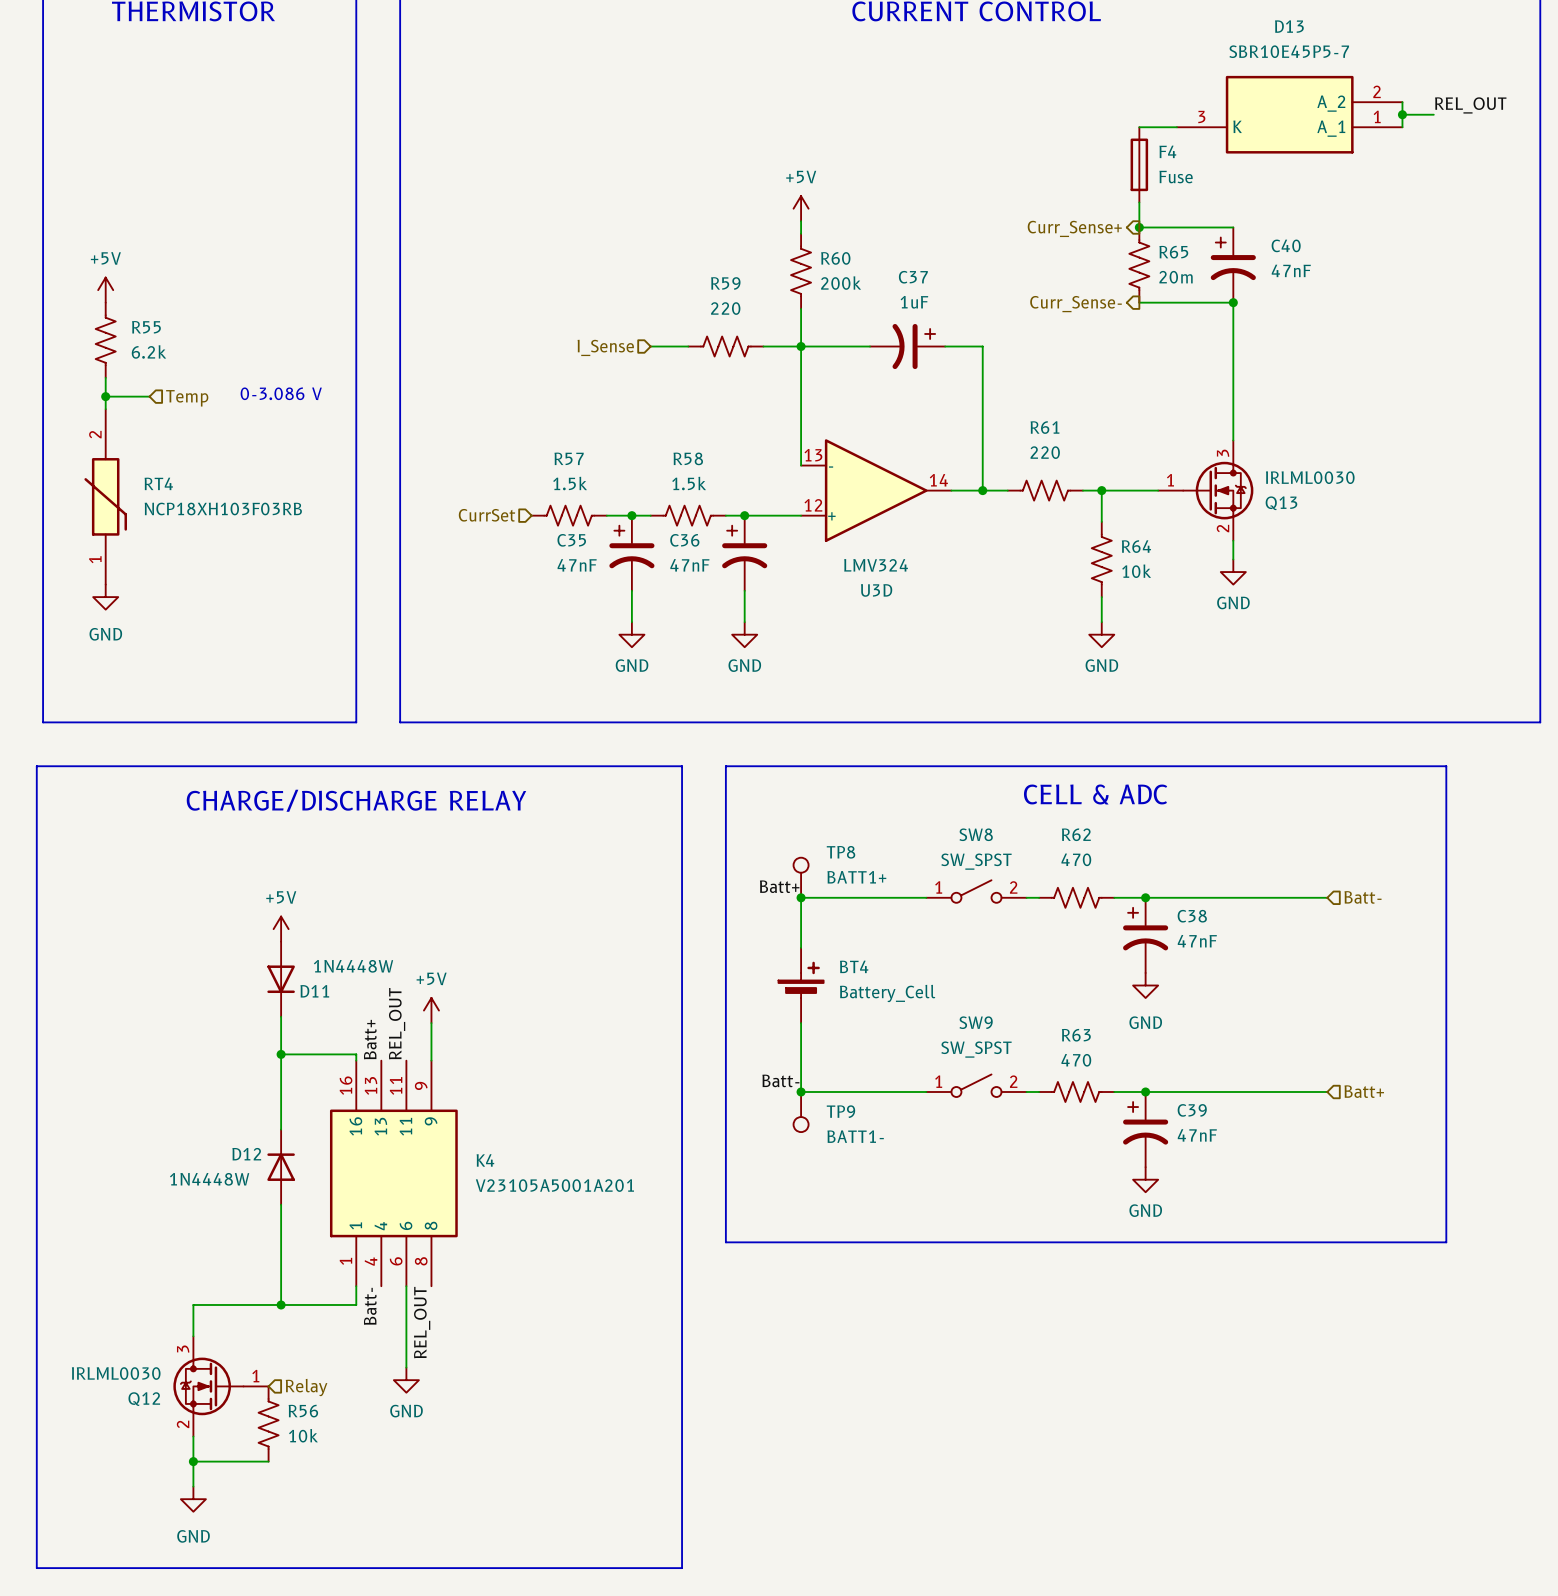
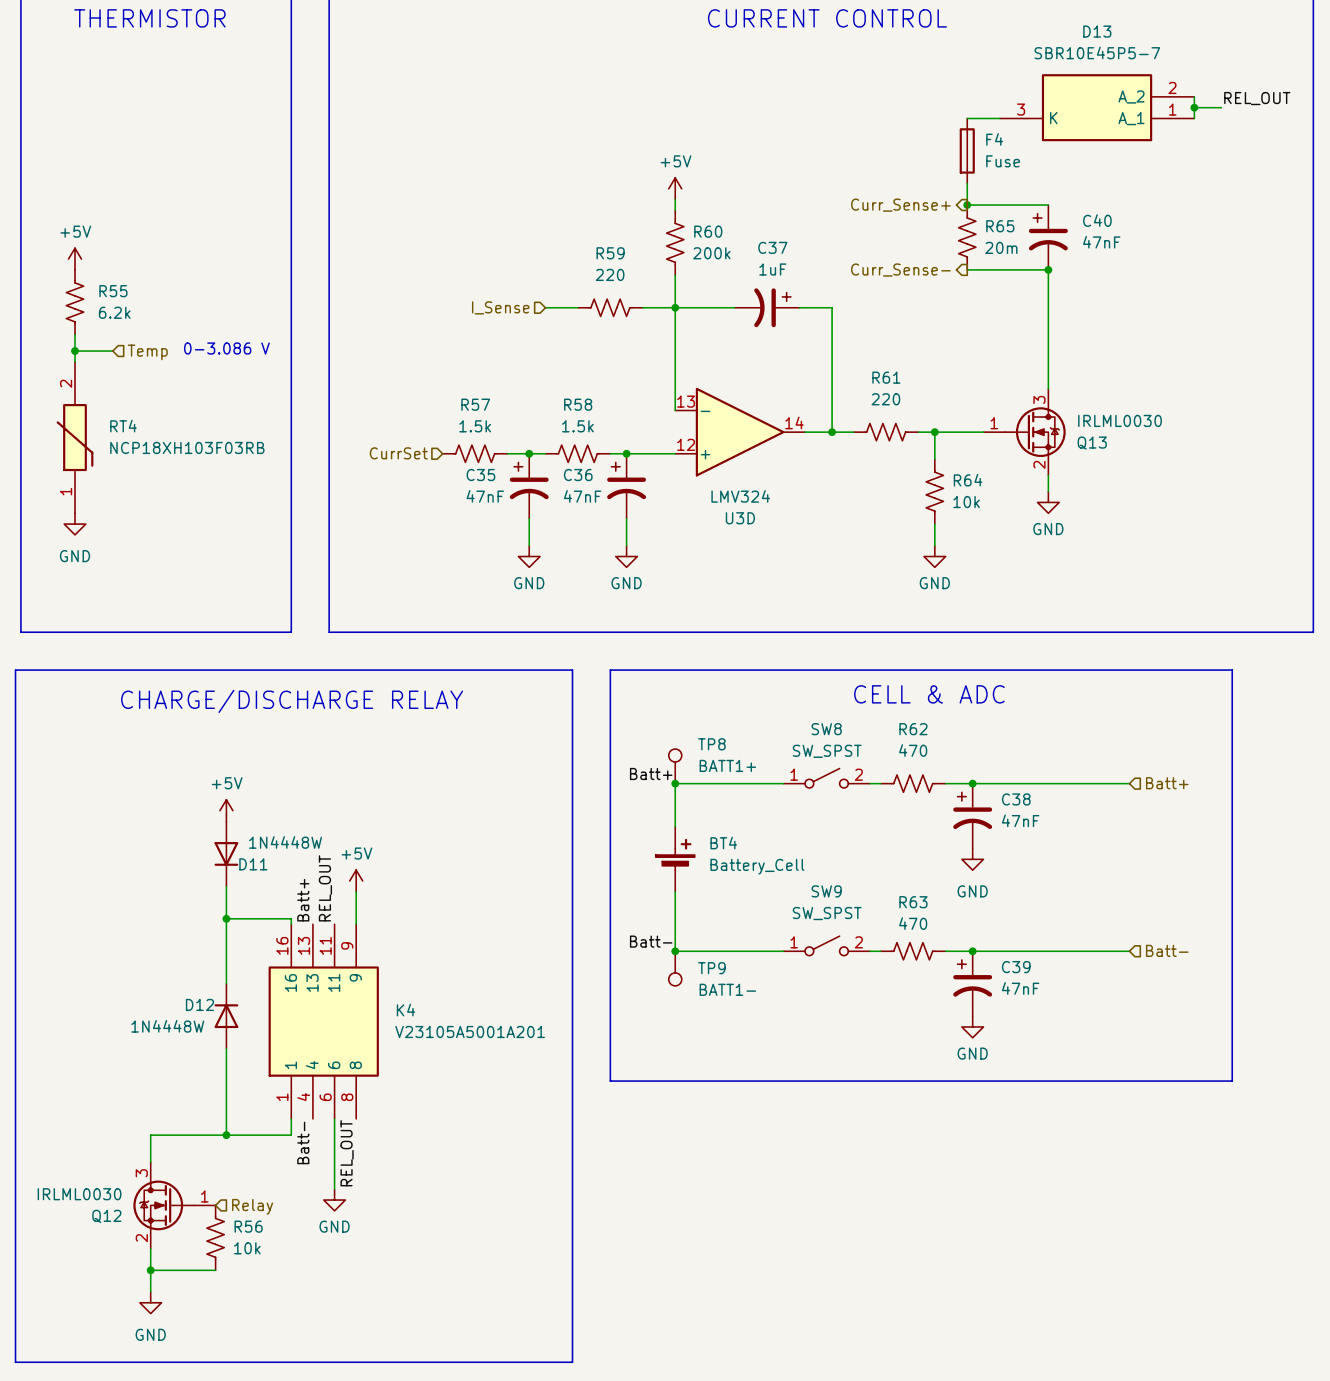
hierarchical label: Batt- (1363, 897) -> Batt+ (1167, 783)
hierarchical label: Batt+ (1364, 1091) -> Batt- (1167, 950)

